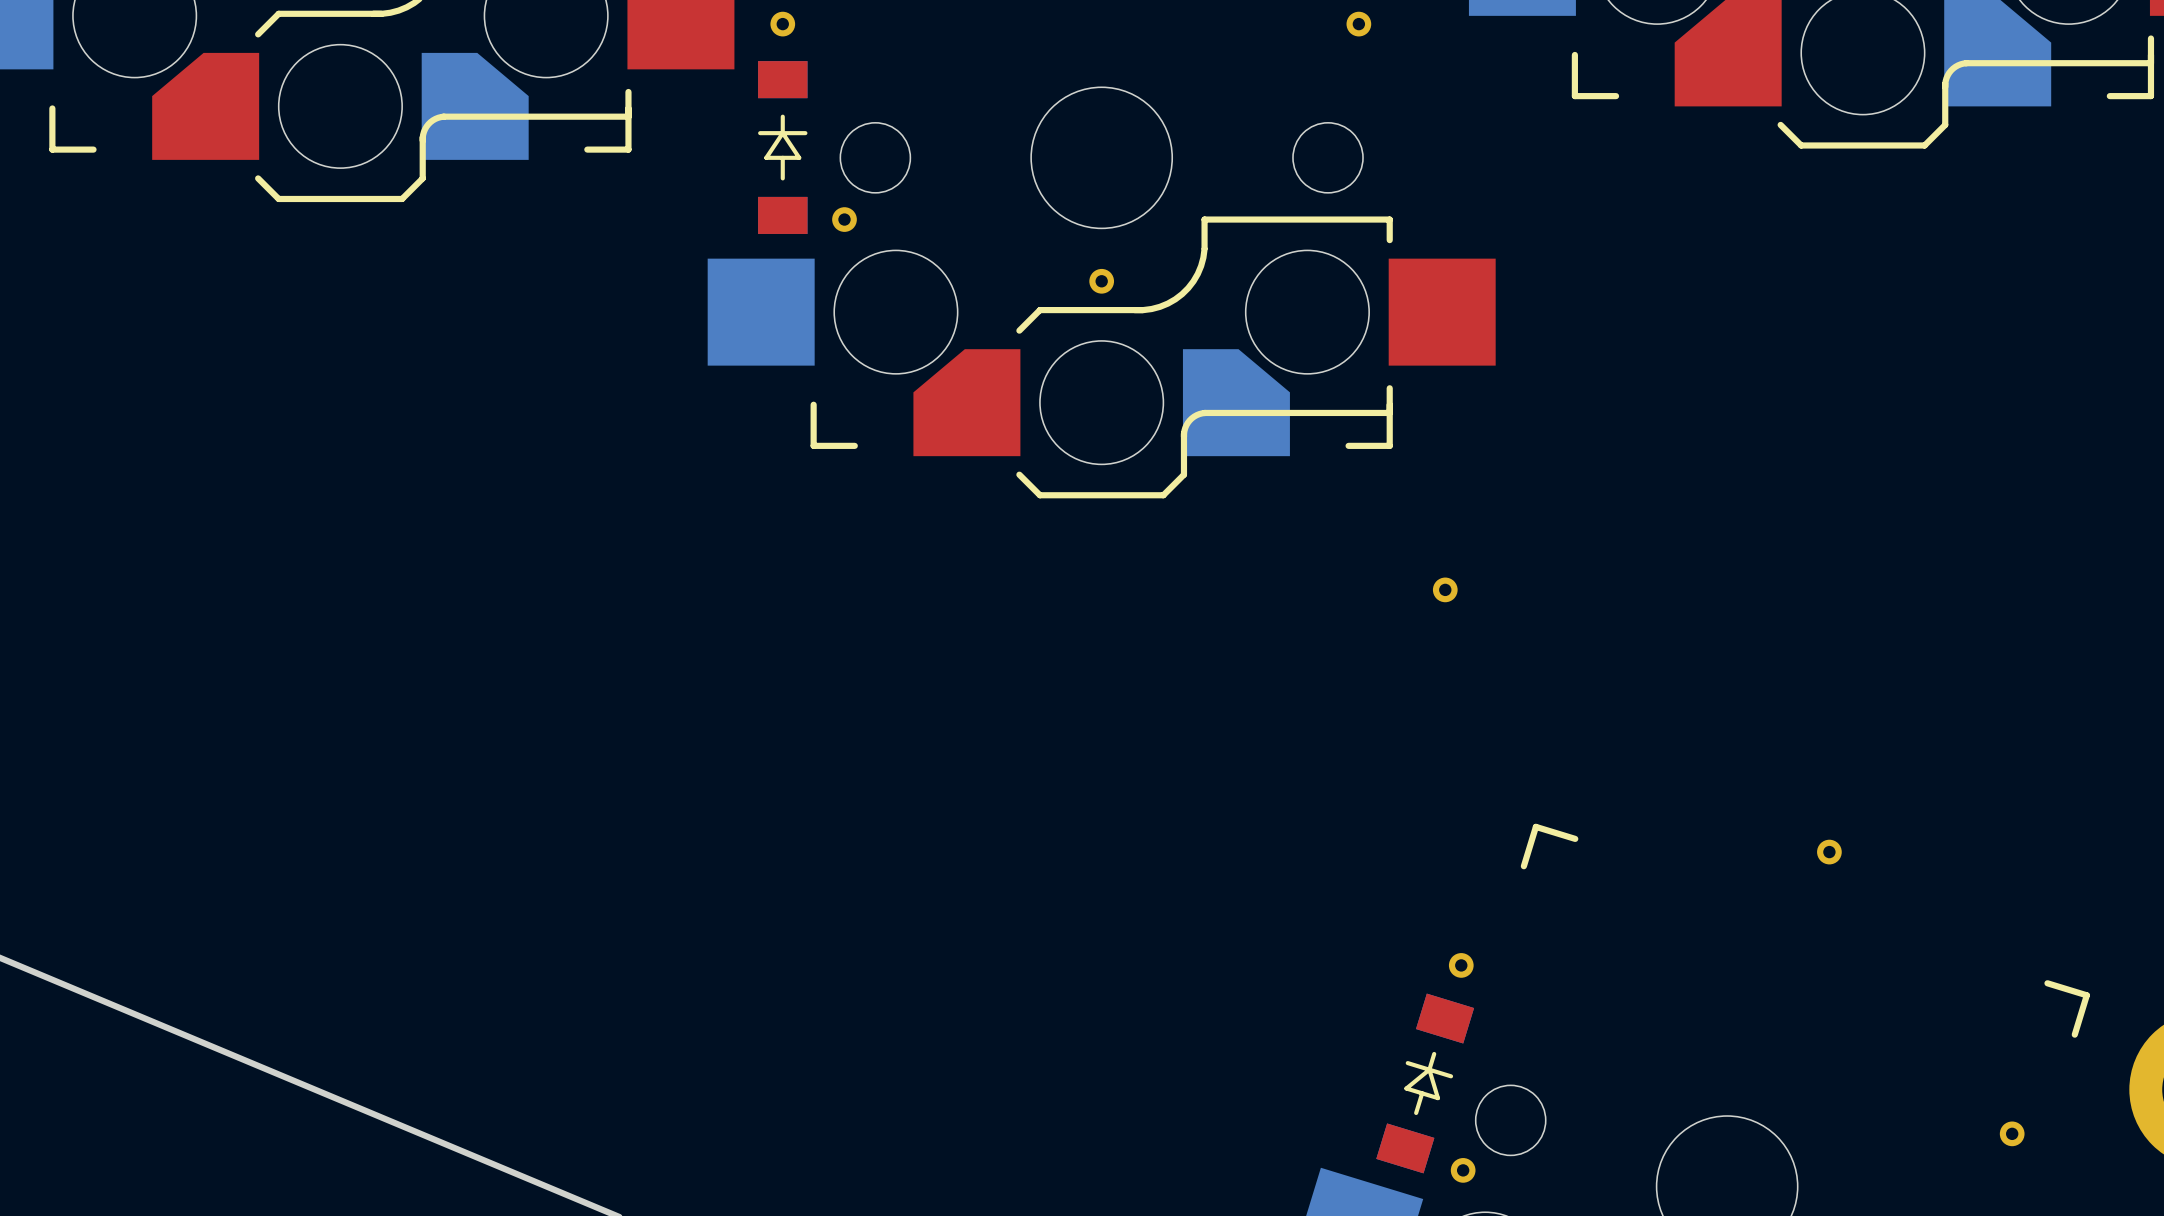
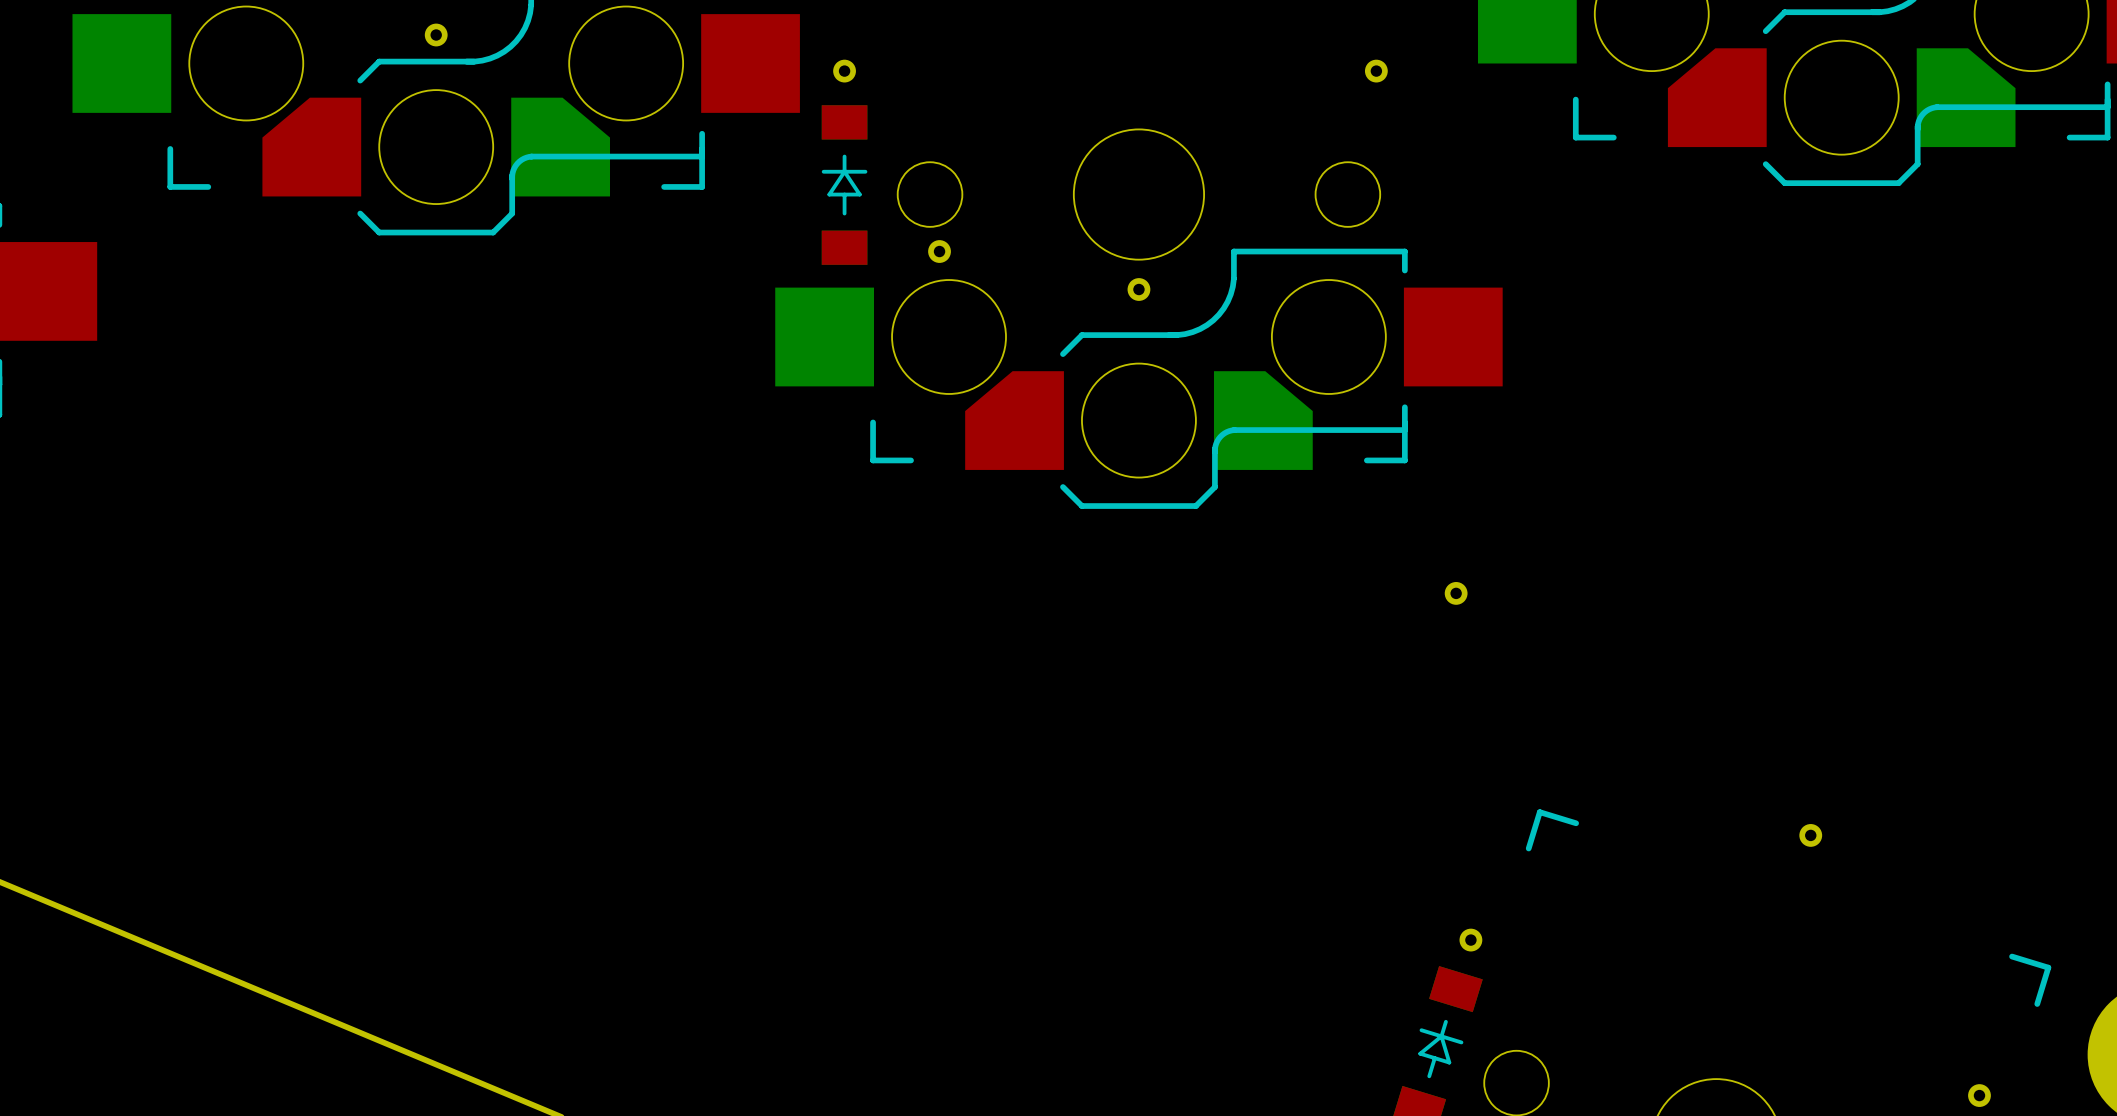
part position: (844, 219) -> (939, 251)
part position: (1101, 281) -> (1138, 289)

